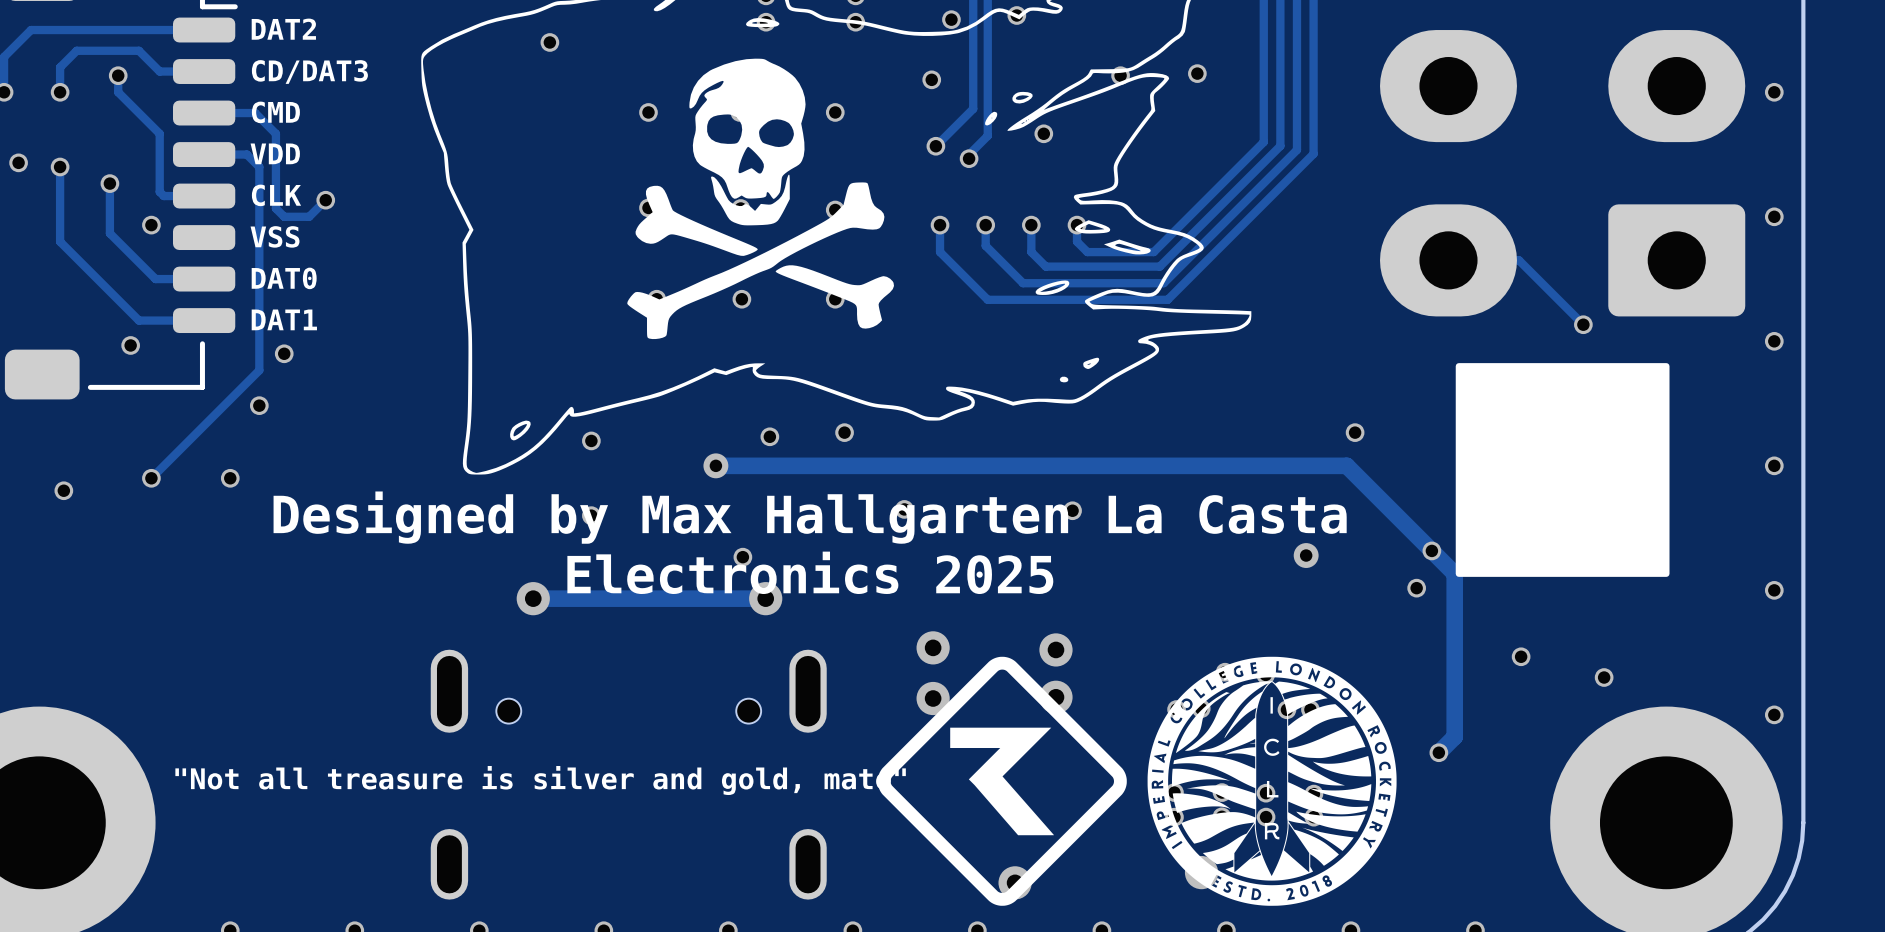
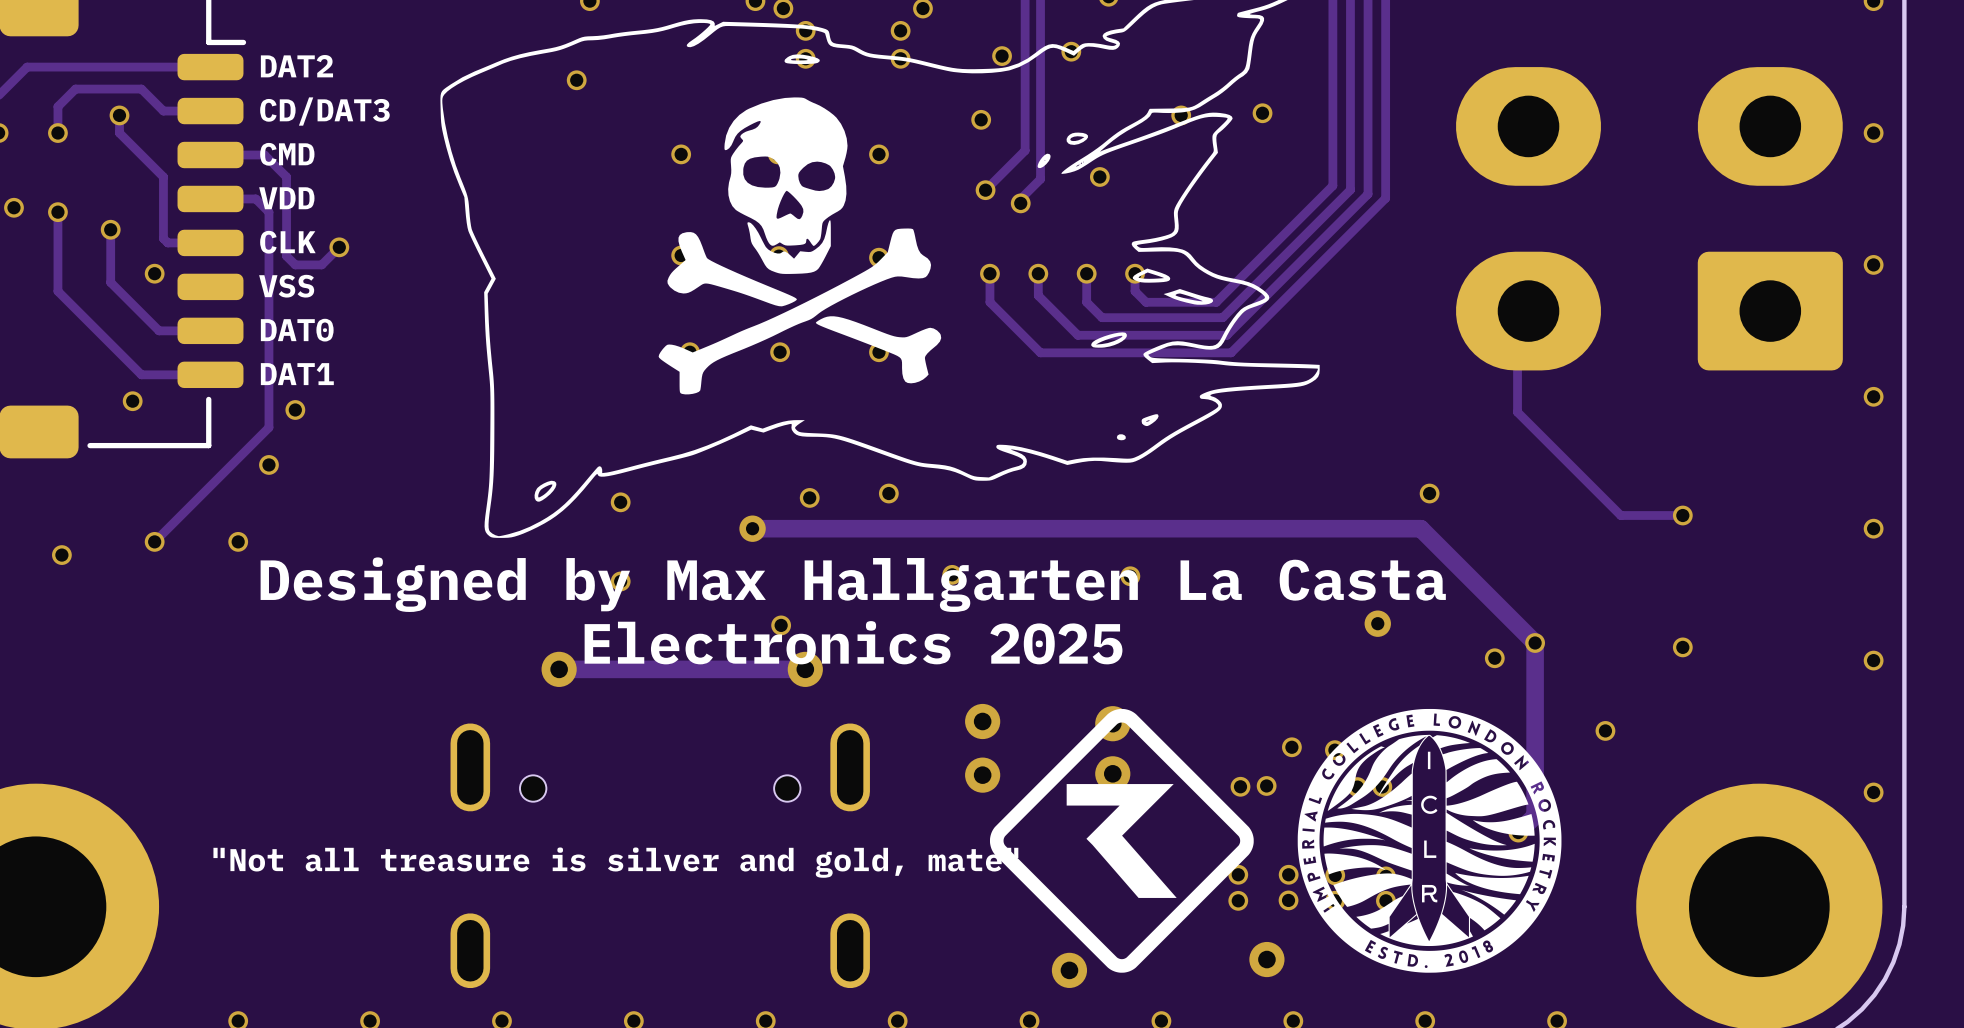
track: none -> (1517, 311) (1517, 412) (1620, 515) (1682, 515)
track: (1448, 270) (1458, 260) (1519, 260) (1583, 324) -> none
via: (1583, 324) -> none
drawing: [1455, 363, 1670, 577] -> none
via: none -> (1682, 515)
via position: (1431, 550) -> (1535, 643)
via: none -> (1682, 647)
via: (1604, 677) -> none
text position: "Not all treasure is silver and gold, mate" (540, 780) -> "Not all treasure is silver and gold, mate" (615, 862)
drawing position: (1002, 781) -> (1121, 840)
drawing position: (1272, 781) -> (1429, 840)

